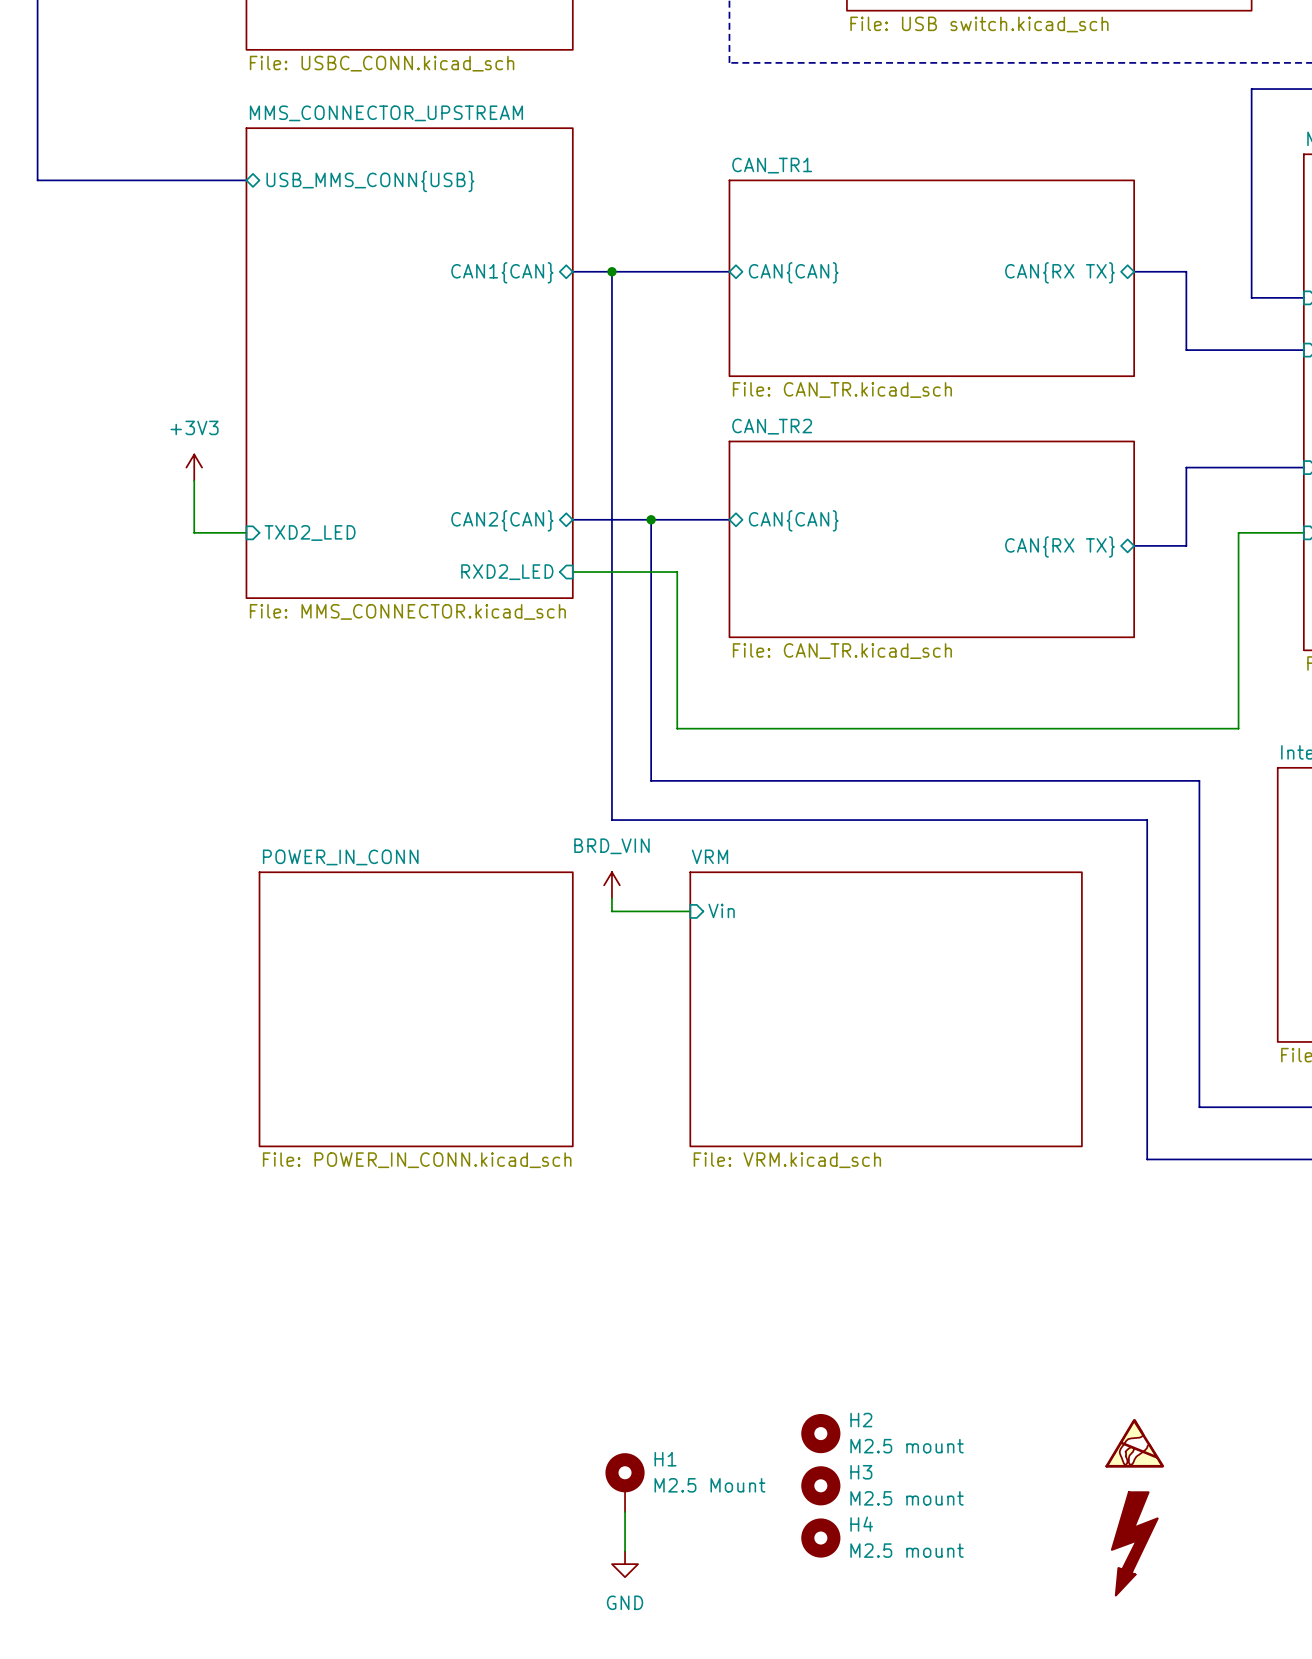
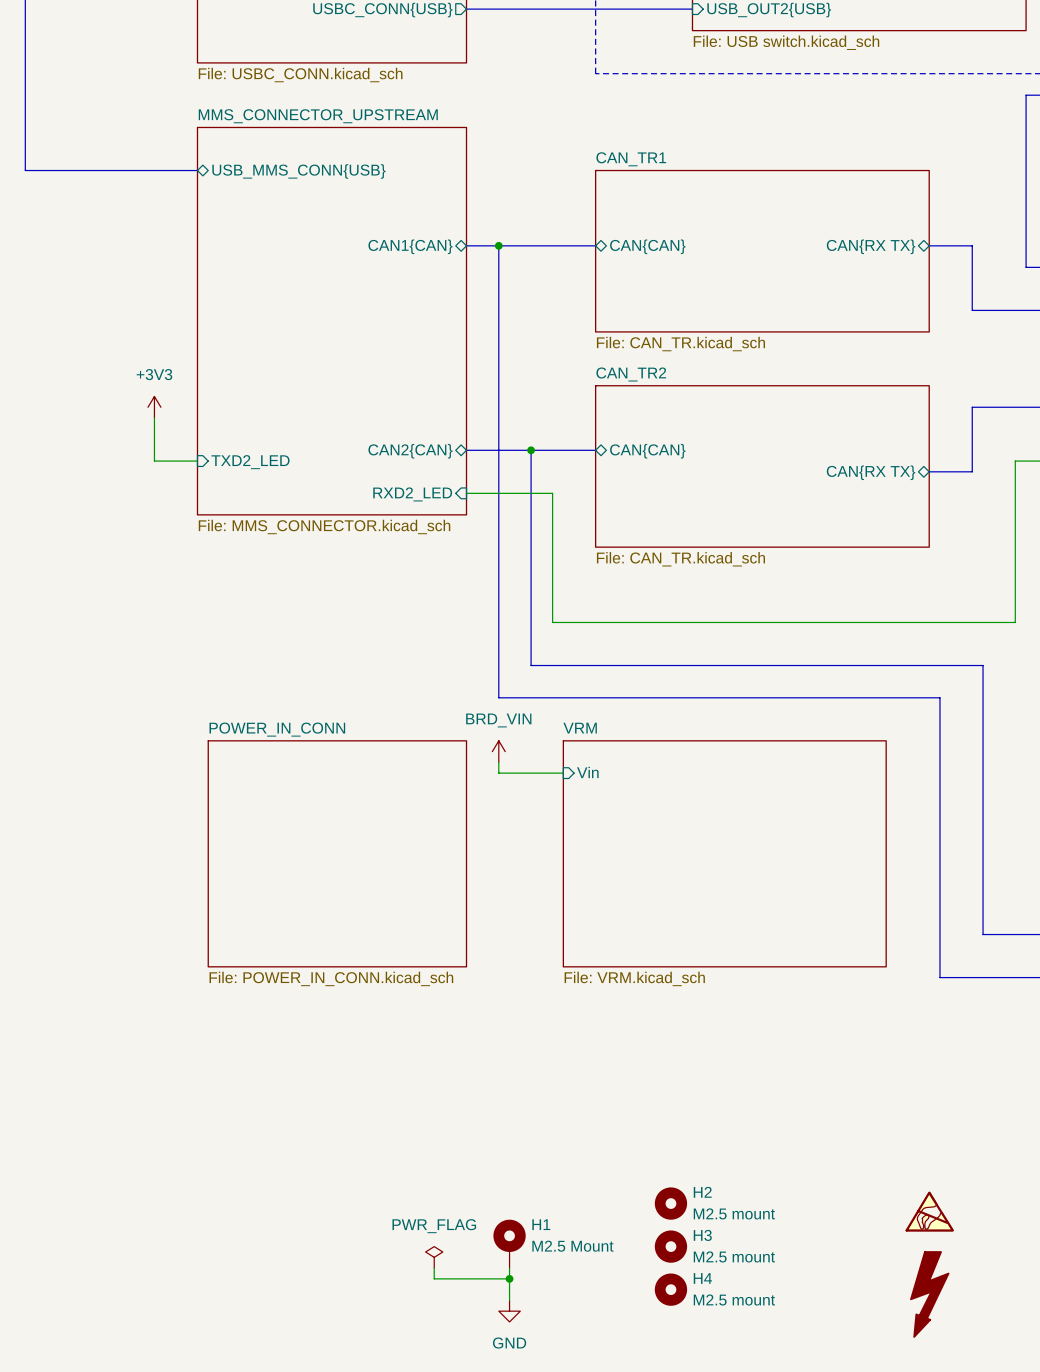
power symbol: none -> PWR_FLAG (434, 1257)
wire: none -> (434, 1268) (434, 1278) (509, 1278)
junction: none -> (509, 1278)

